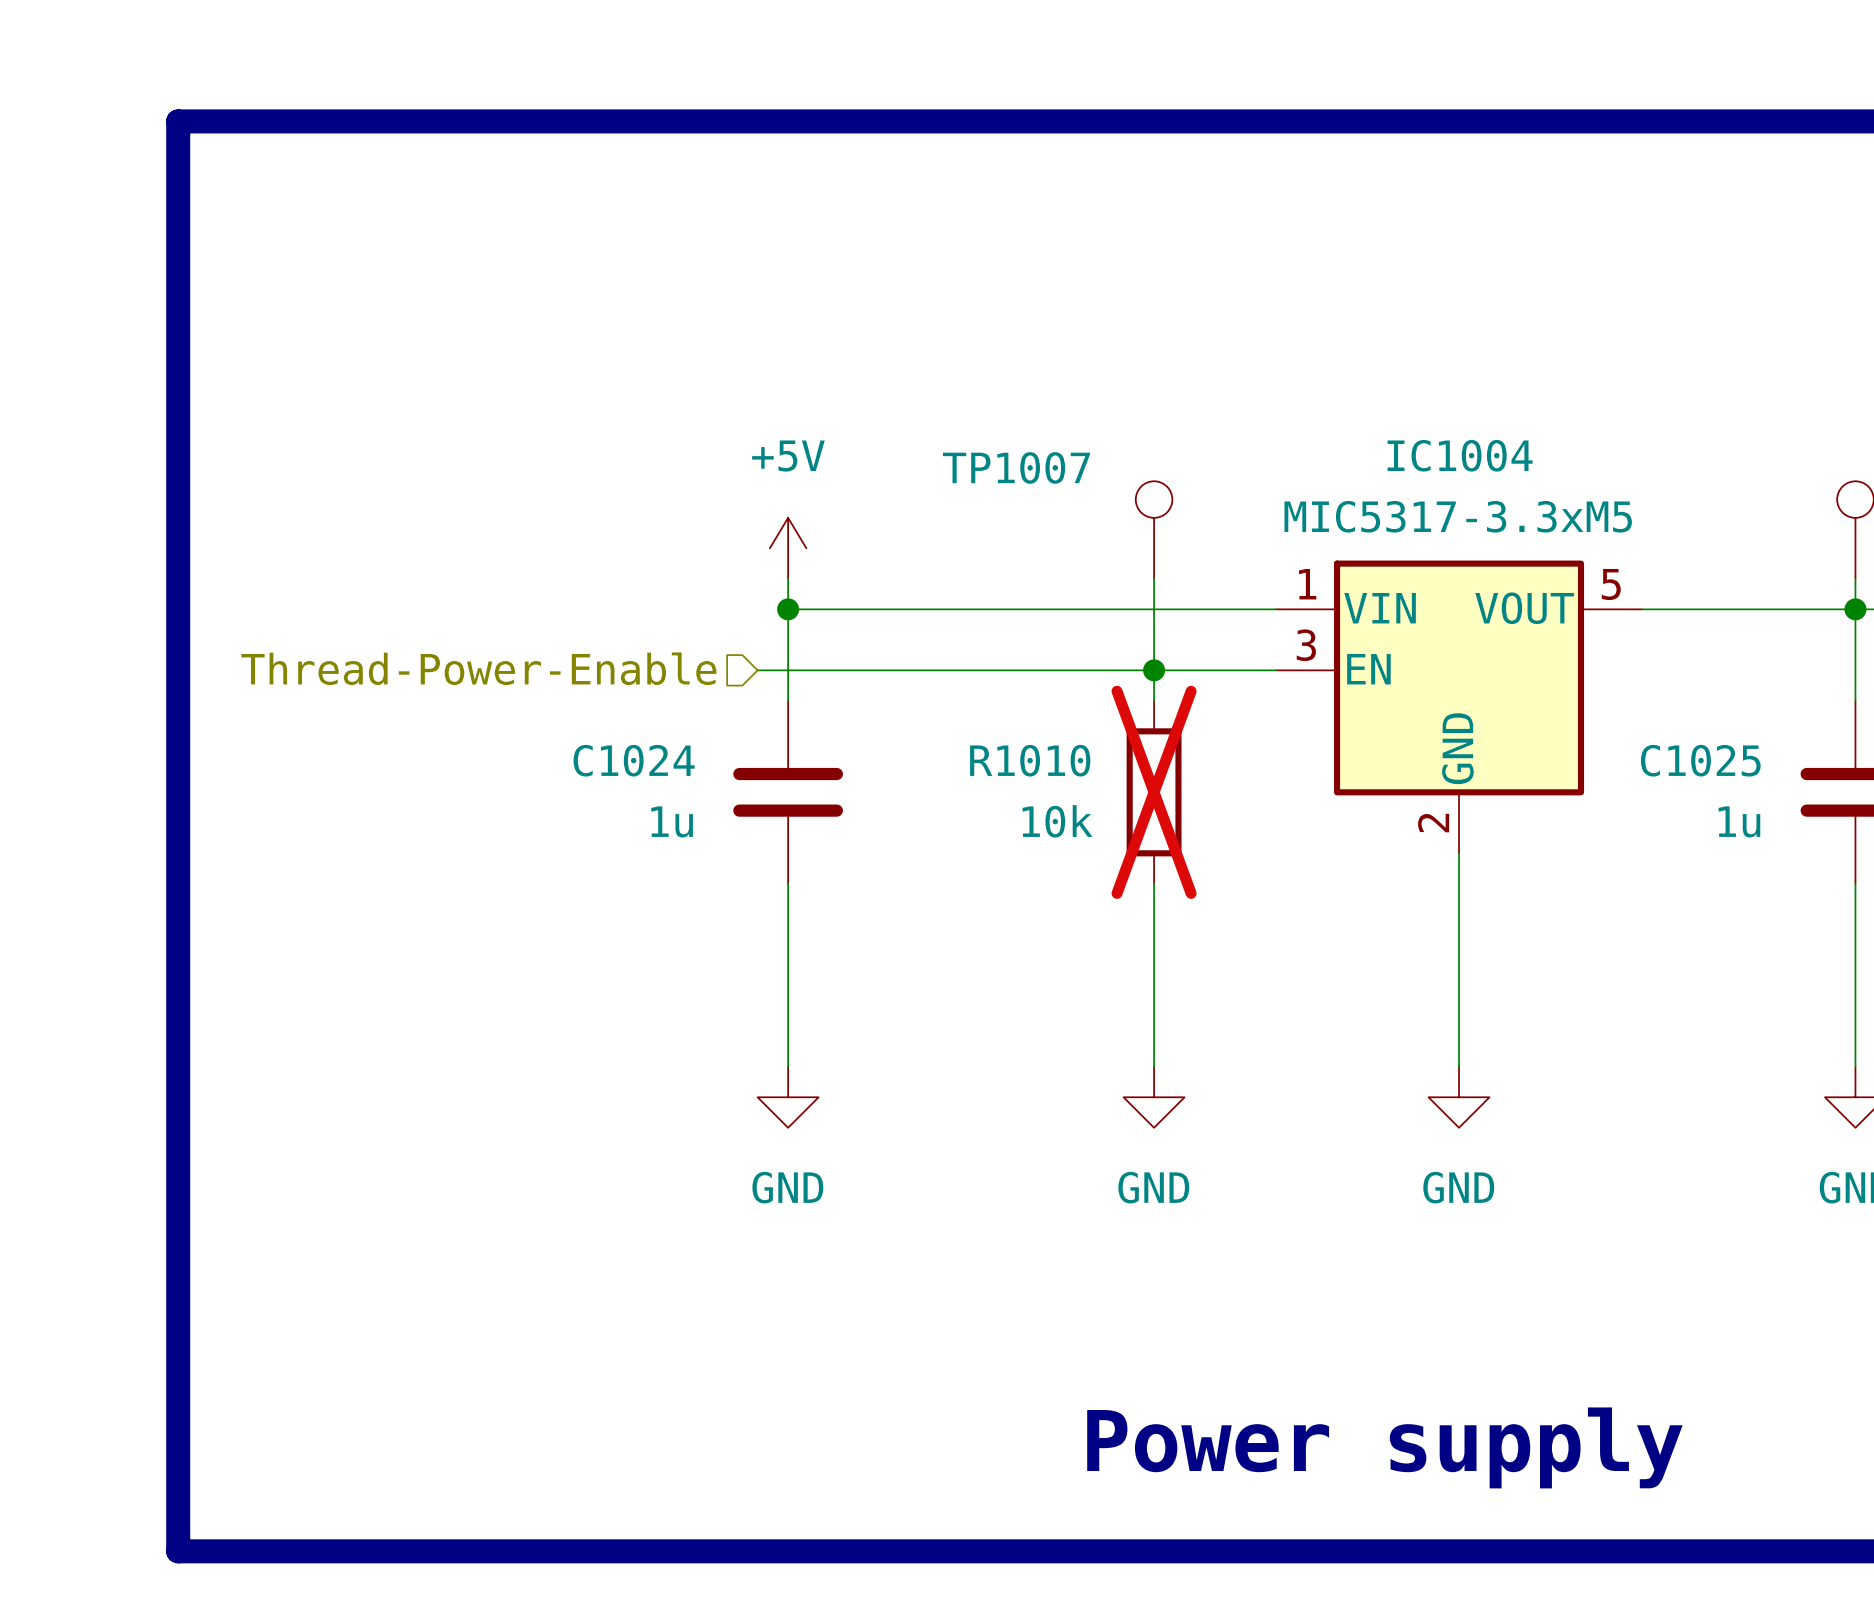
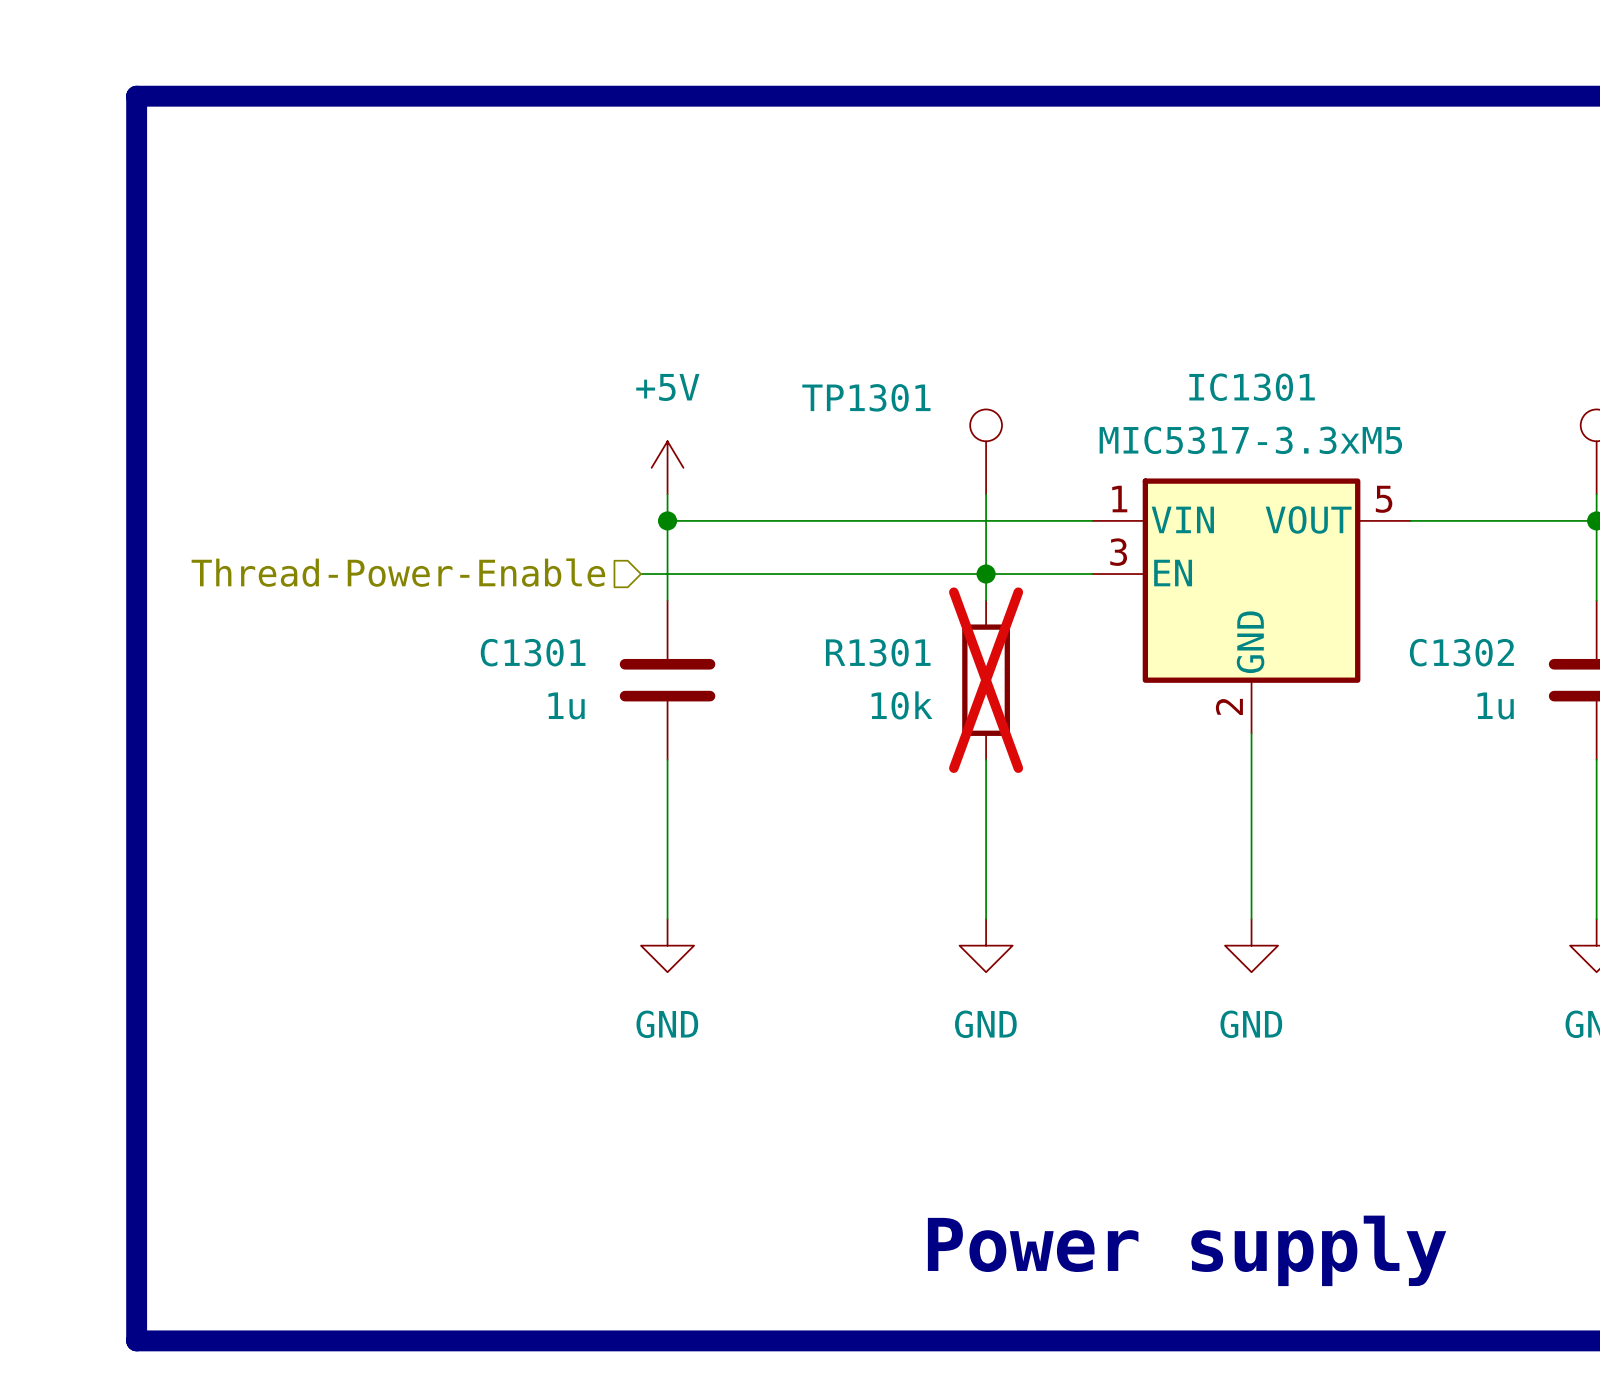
IC1004 name: IC1004 (1460, 455) -> IC1301 (1252, 387)
TP1007 name: TP1007 (1016, 467) -> TP1301 (866, 397)
C1024 name: C1024 (634, 760) -> C1301 (533, 652)
R1010 name: R1010 (1030, 760) -> R1301 (878, 652)
C1025 name: C1025 (1700, 760) -> C1302 (1461, 652)

